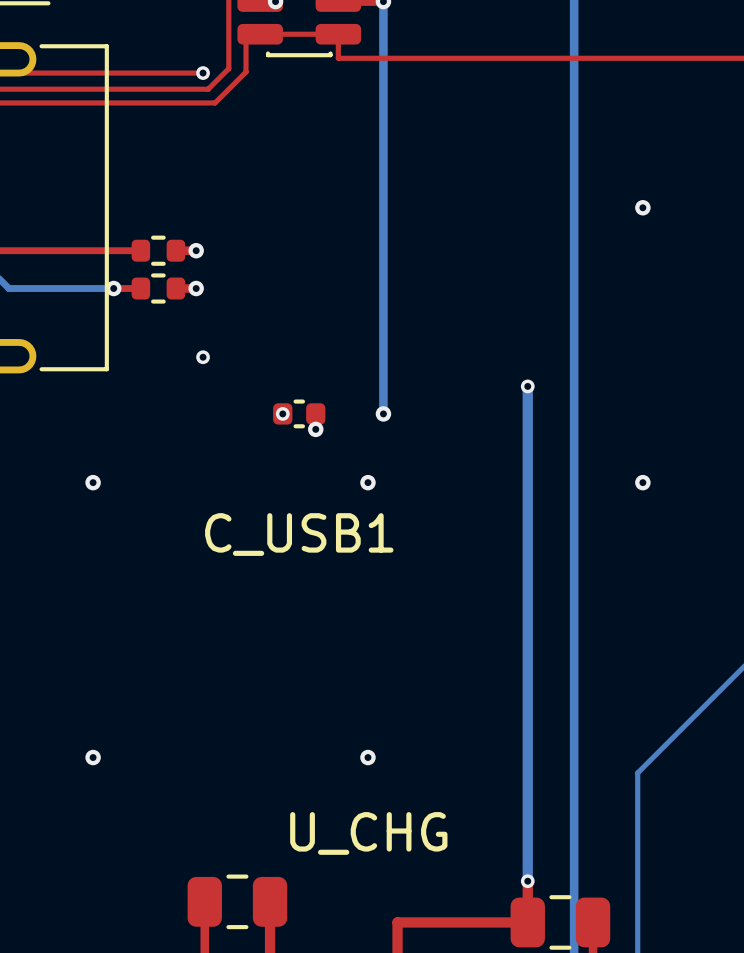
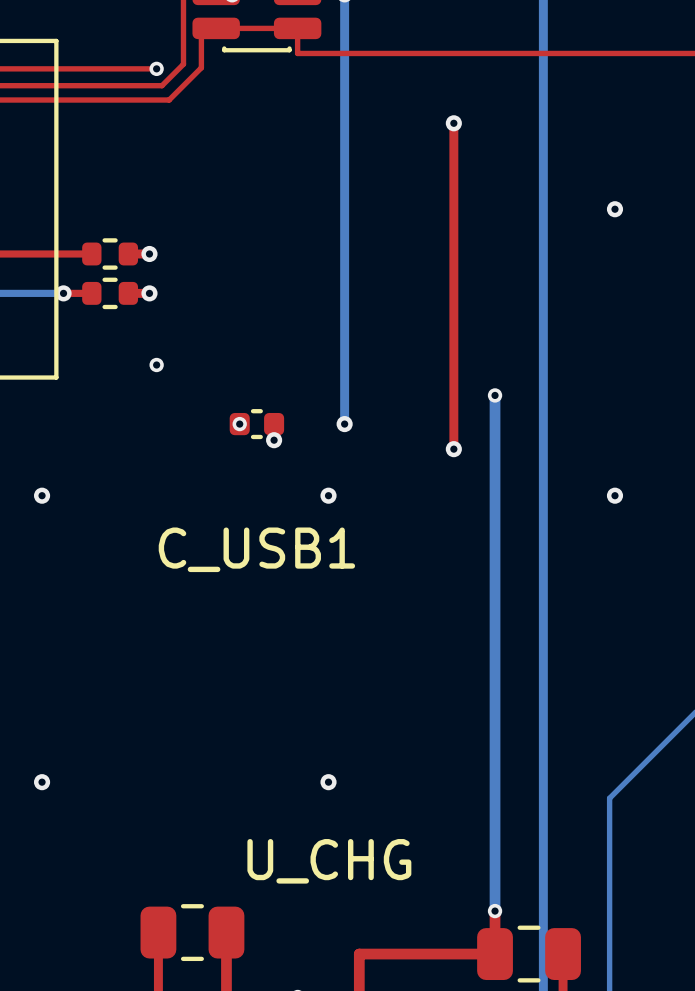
top track: none -> (453, 123) (453, 449)
via: none -> (453, 123)
via: none -> (453, 449)

